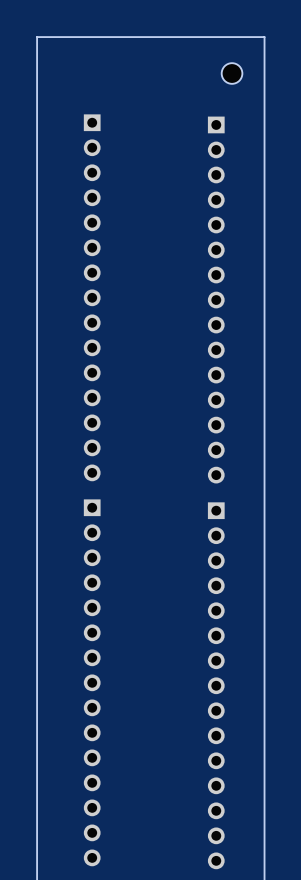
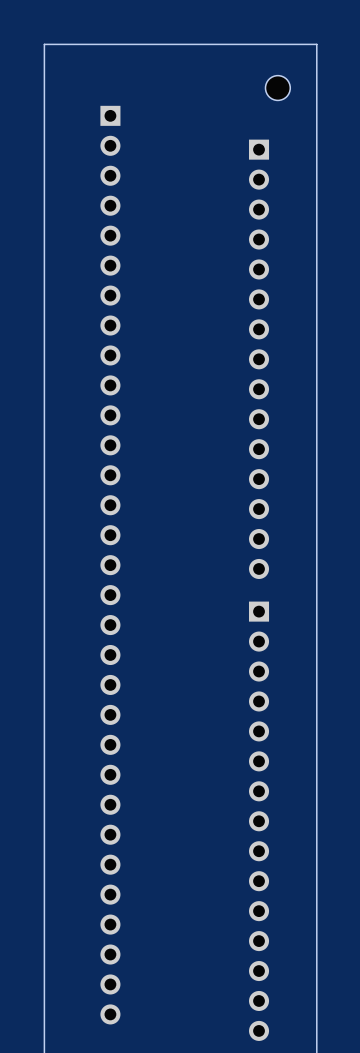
part: (92, 297) -> none
part: none -> (110, 565)
part: (92, 682) -> none

